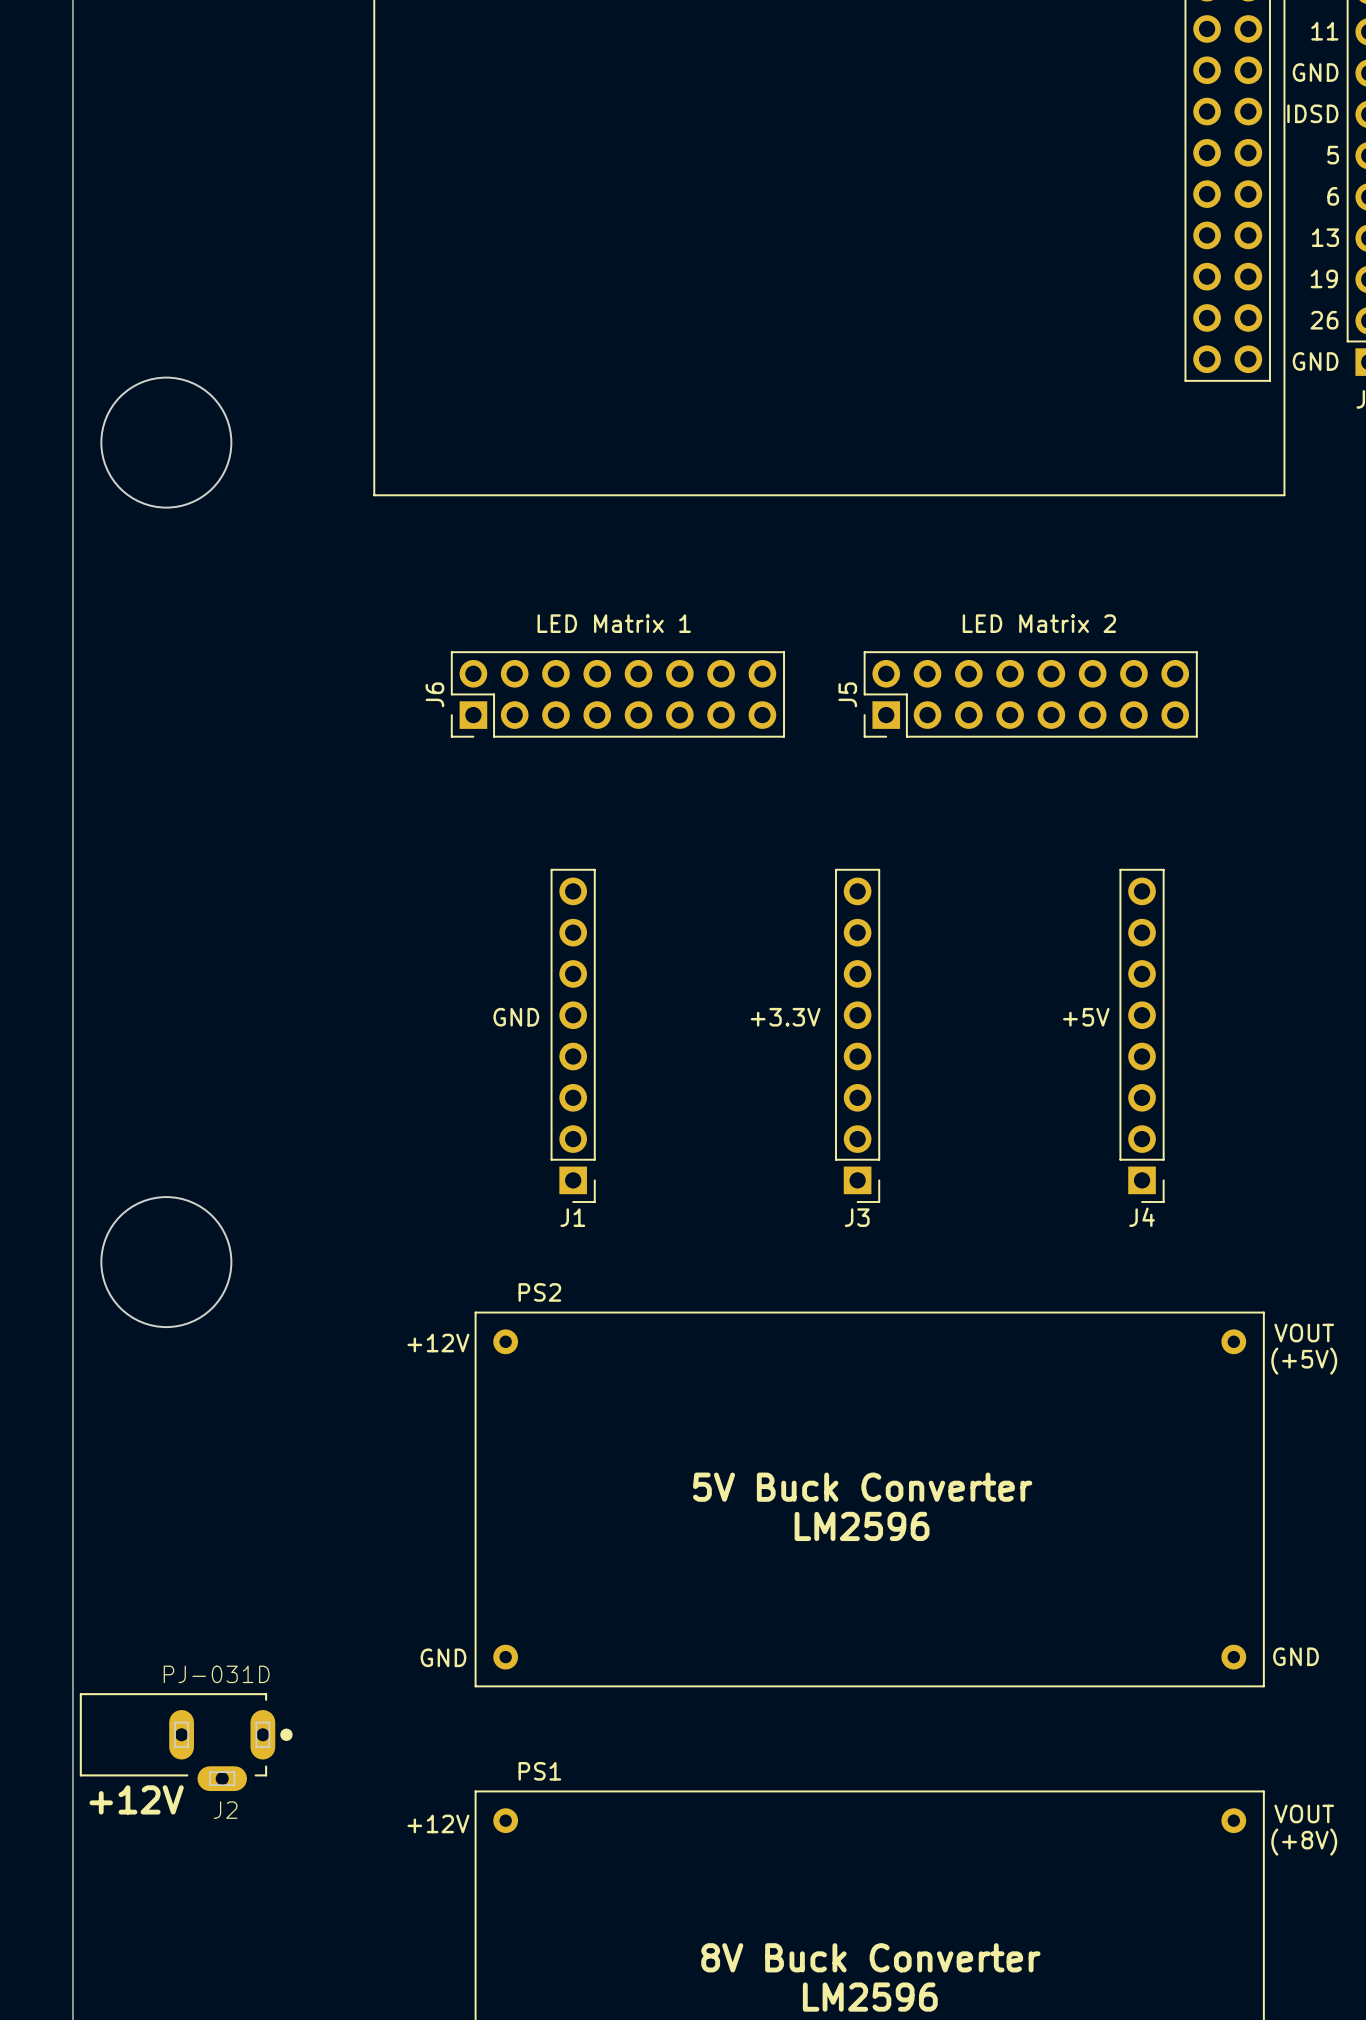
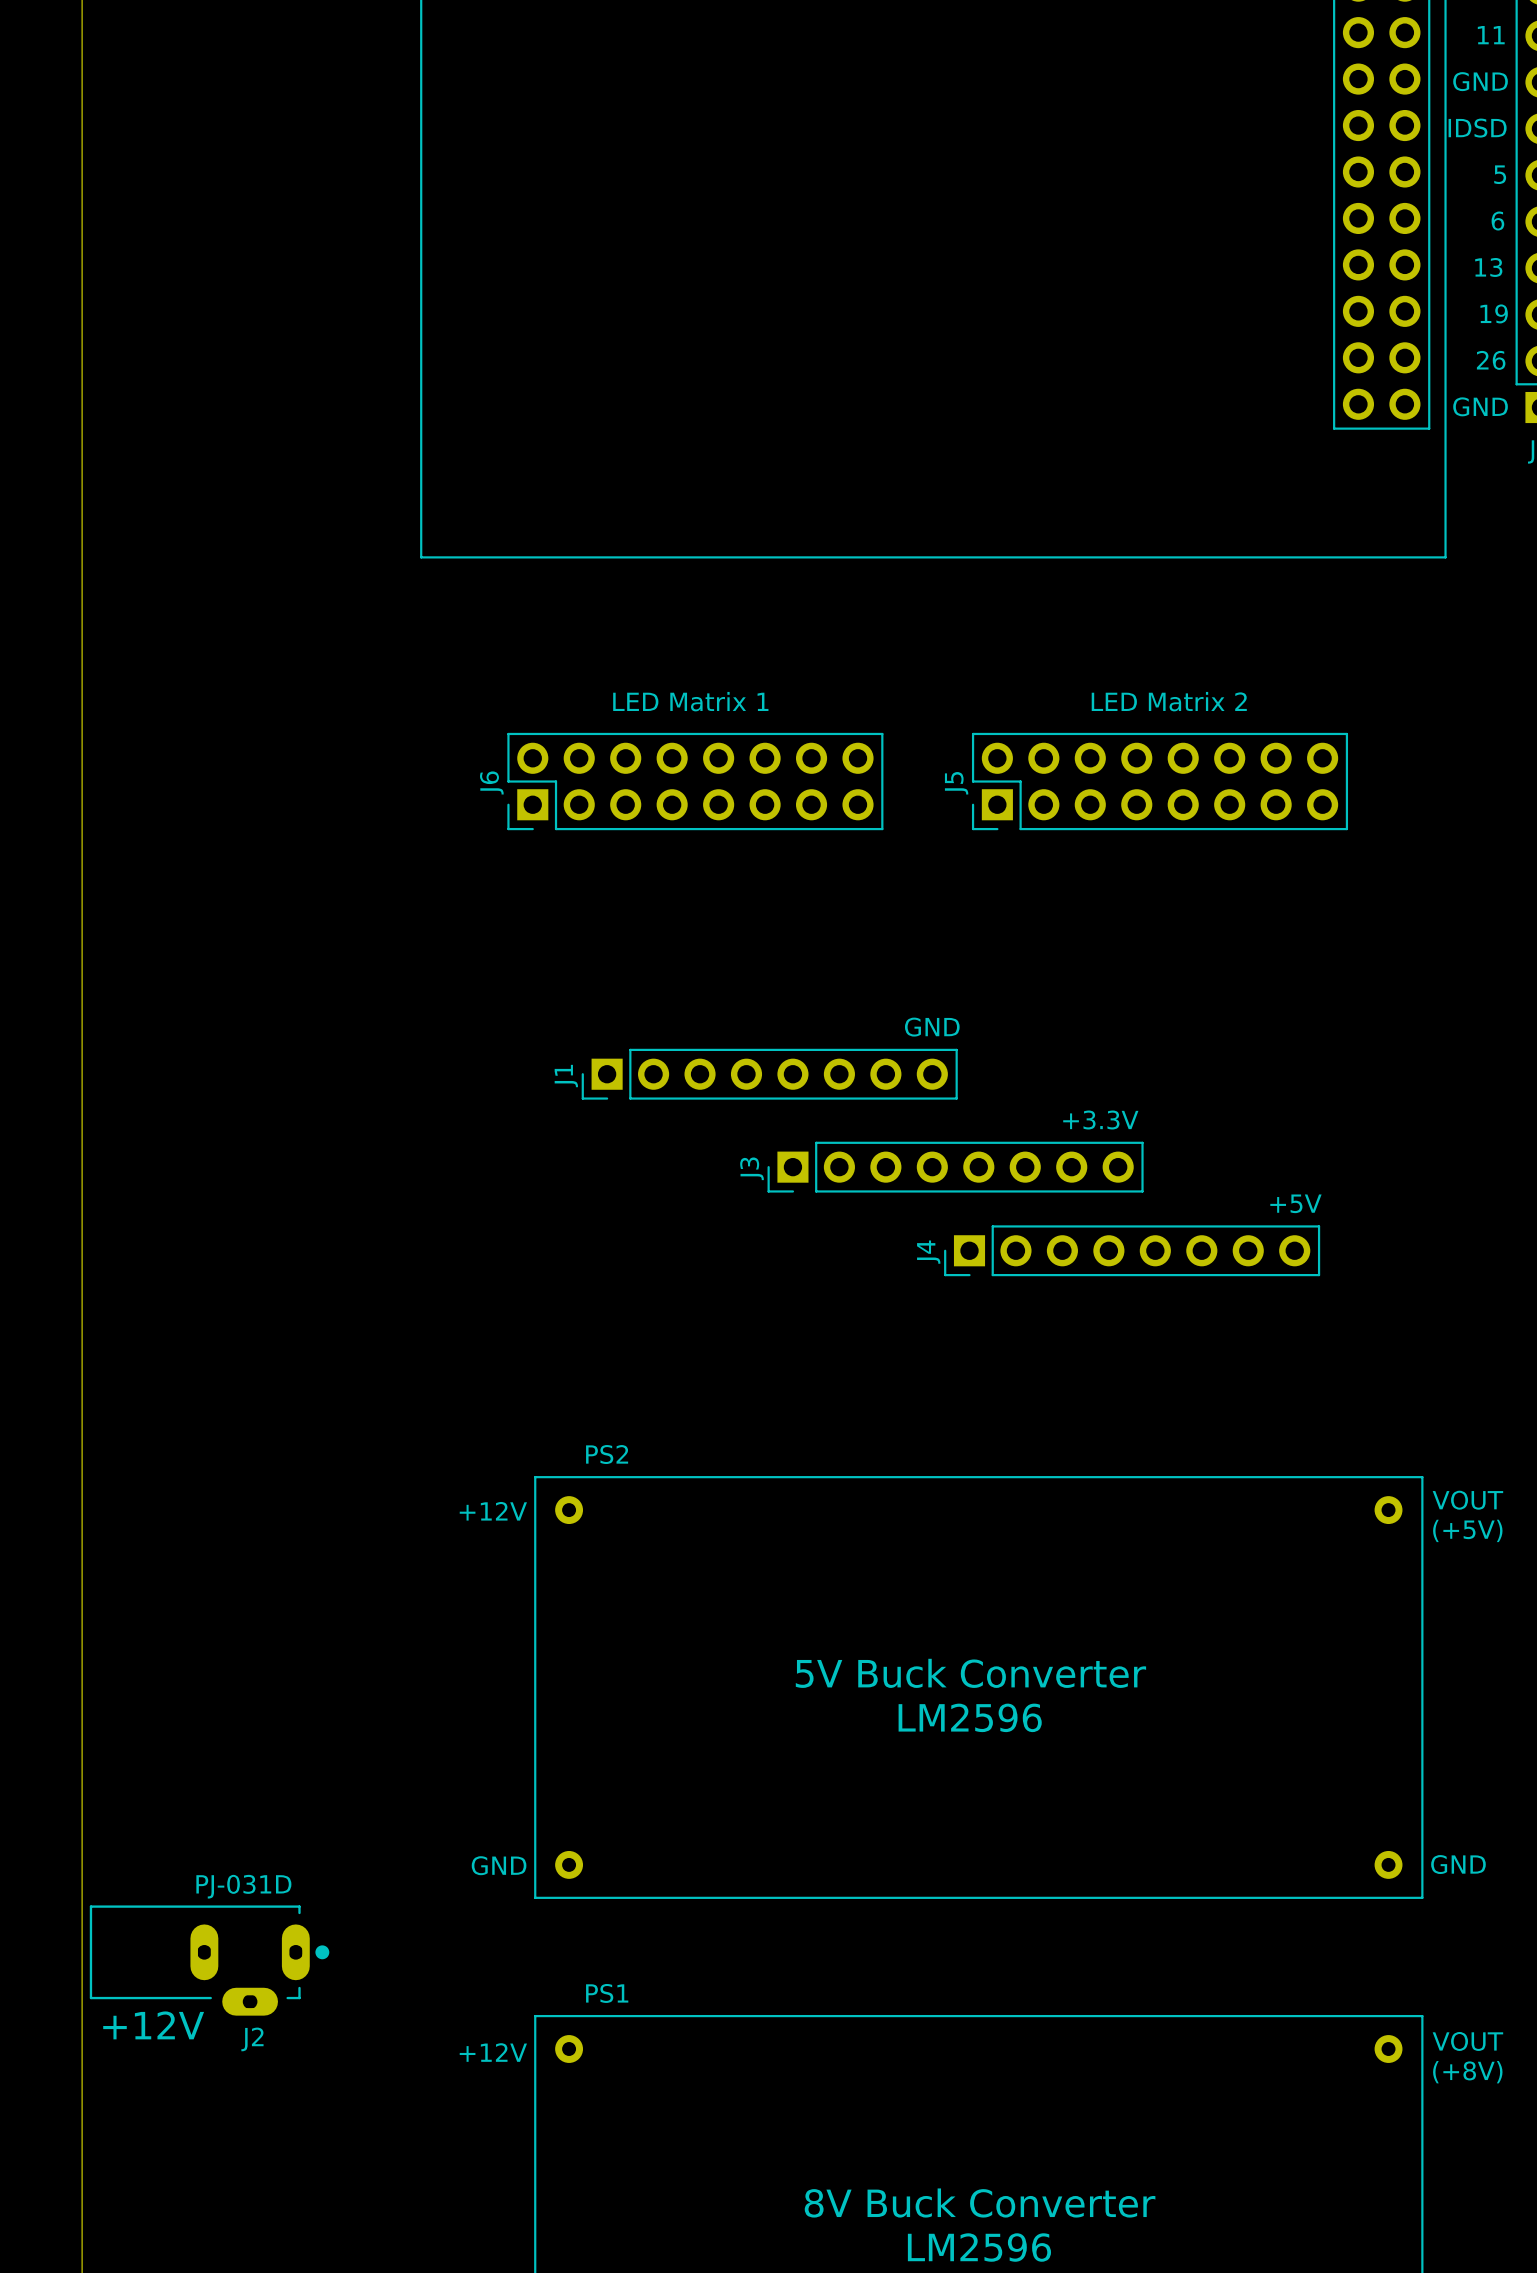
round board edge: [100, 376, 233, 509] -> none
text position: GND (516, 1017) -> GND (932, 1027)
text position: +3.3V (785, 1017) -> +3.3V (1100, 1120)
text position: +5V (1086, 1017) -> +5V (1295, 1203)
J1 rotation: 0° (573, 1035) -> 90° clockwise (769, 1074)
J3 rotation: 0° (857, 1035) -> 90° clockwise (955, 1167)
J4 rotation: 0° (1142, 1035) -> 90° clockwise (1132, 1250)
round board edge: [100, 1196, 233, 1329] -> none

